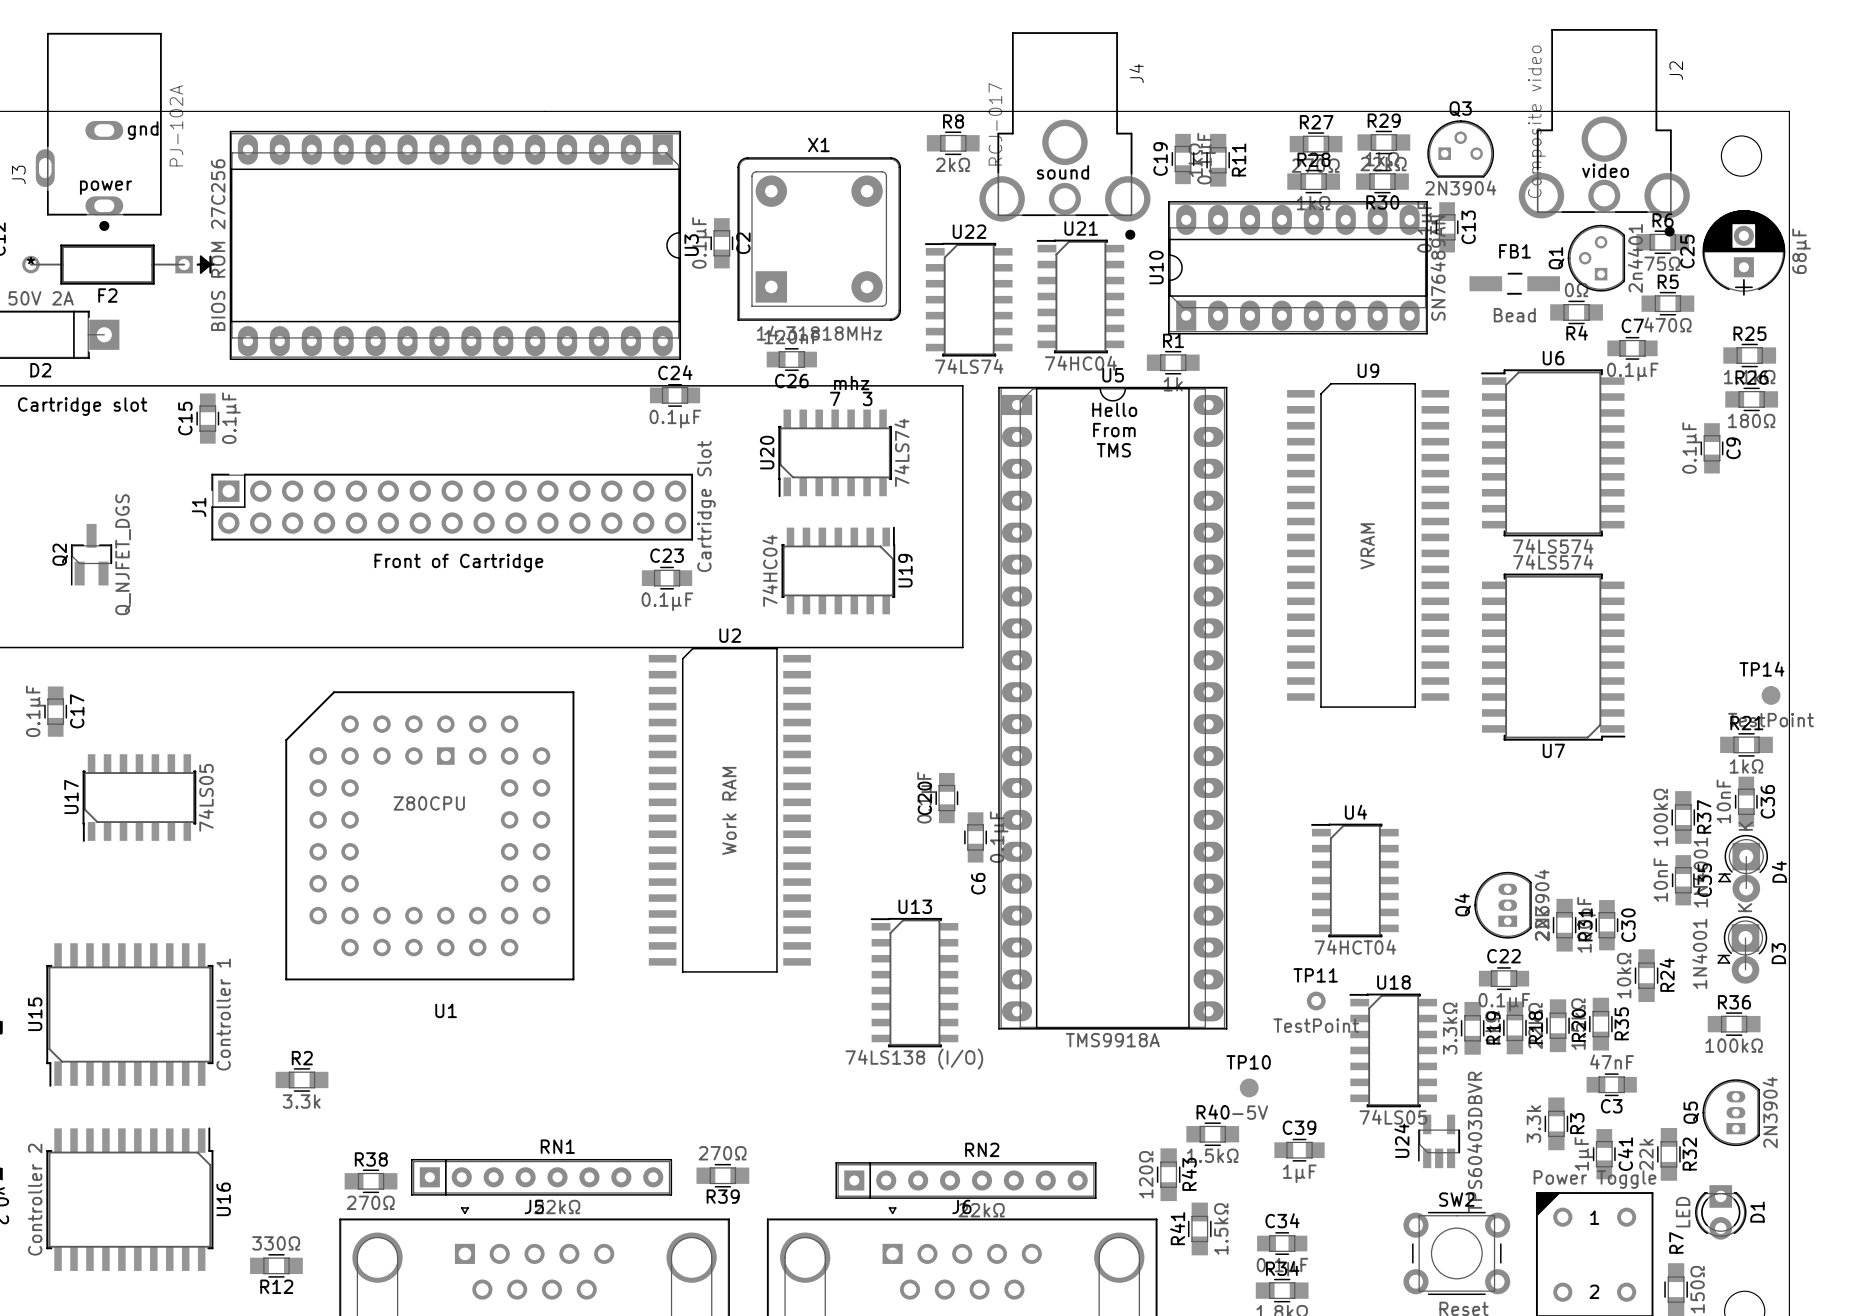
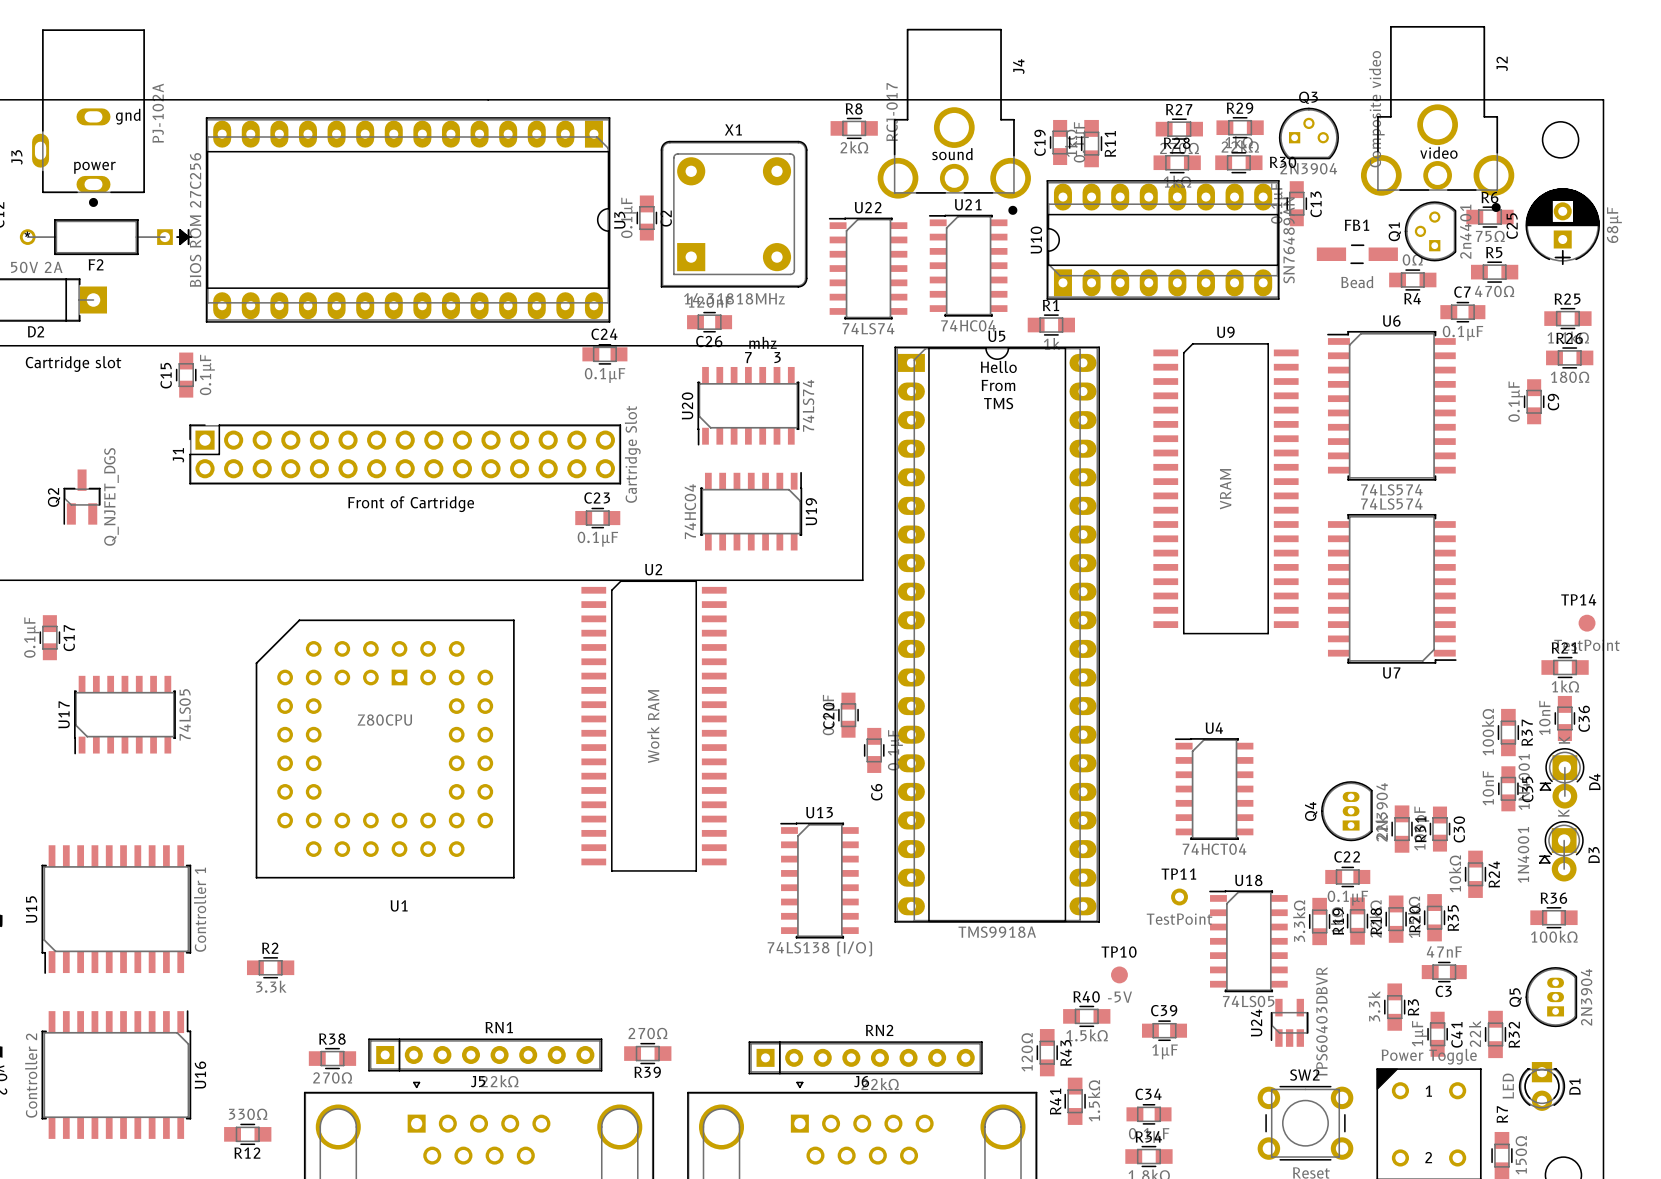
R30 name position: R30 (1382, 202) -> R30 (1283, 162)

